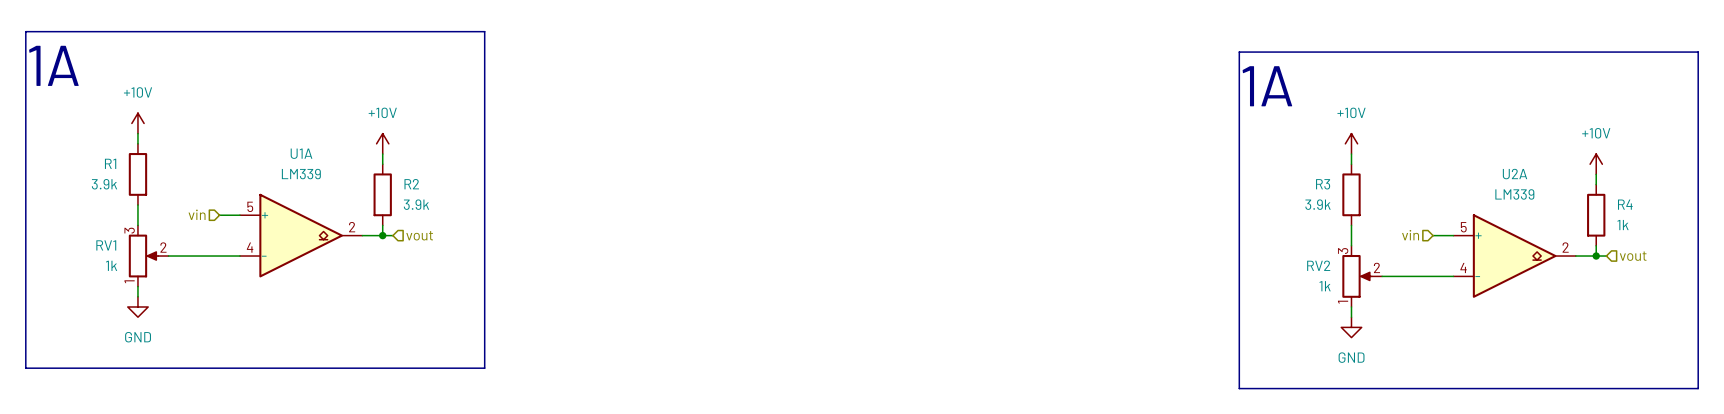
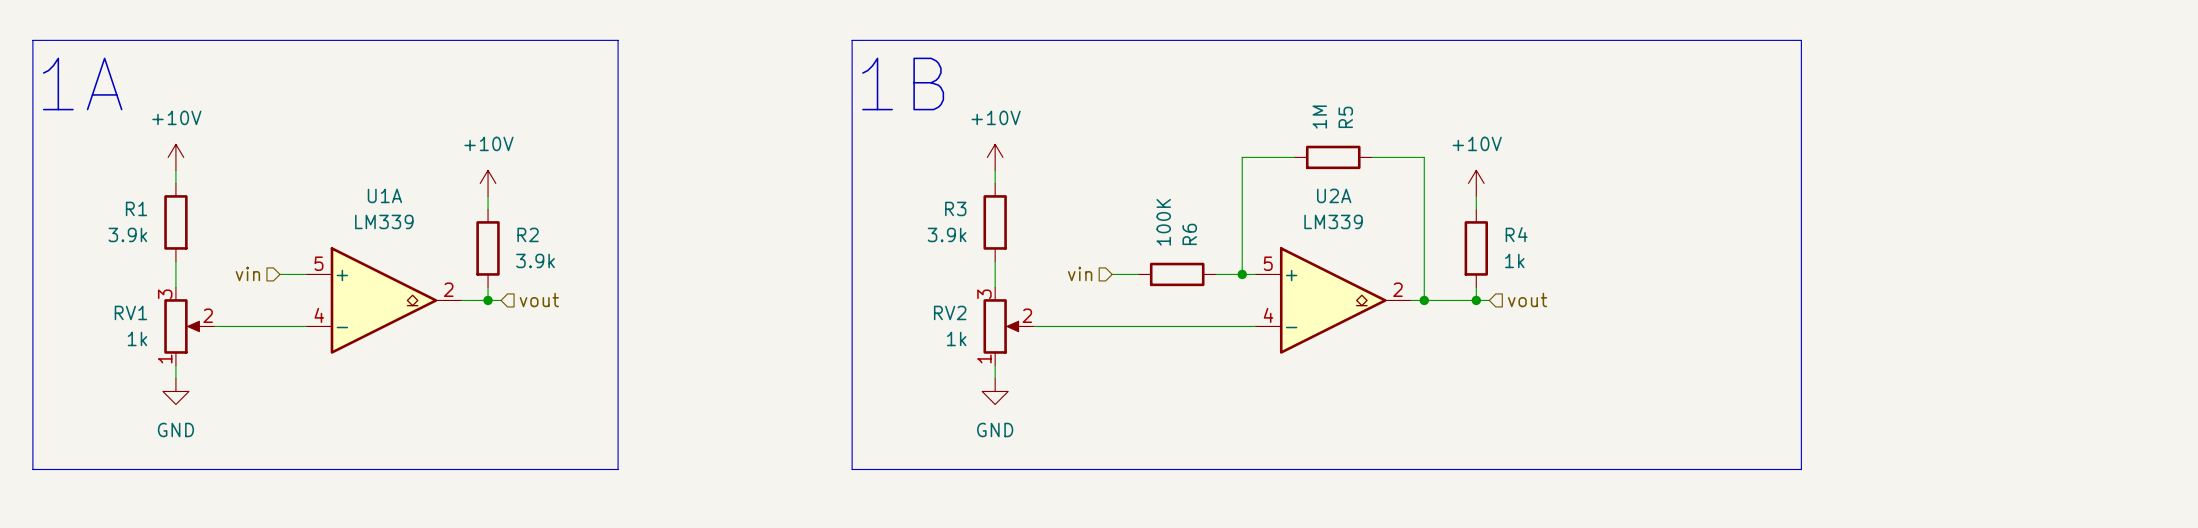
line: none -> (852, 40) (1801, 40) (1801, 469) (852, 469) (852, 40)
line: (1239, 52) (1698, 52) (1698, 388) (1239, 388) (1239, 52) -> none
text: none -> 1B (903, 83)
text: 1A (1267, 86) -> none
power symbol: none -> +10V (995, 157)
wire: none -> (1294, 157) (1242, 157) (1242, 274)
R5: none -> 1M (1333, 157)
wire: none -> (1372, 157) (1424, 157) (1424, 300)
wire: none -> (995, 170) (995, 183)
power symbol position: +10V (1351, 143) -> +10V (1476, 183)
wire: (1351, 154) (1351, 164) -> (1476, 196) (1476, 209)
power symbol: +10V (1596, 164) -> none
wire: (1596, 174) (1596, 184) -> none
R3 position: (1351, 194) -> (995, 222)
wire: none -> (995, 261) (995, 287)
hierarchical label: none -> vin (1080, 273)
wire: none -> (1112, 274) (1138, 274)
R6: none -> 100K (1177, 274)
wire: none -> (1216, 274) (1255, 274)
junction: none -> (1242, 274)
R4 position: (1596, 215) -> (1476, 248)
wire: none -> (1476, 287) (1476, 300)
wire: (1351, 225) (1351, 245) -> none
wire: none -> (1411, 300) (1489, 300)
junction: none -> (1424, 300)
junction: none -> (1476, 300)
hierarchical label: none -> vout (1527, 299)
hierarchical label: vin (1410, 235) -> none
wire: (1433, 235) (1453, 235) -> none
wire: (1596, 245) (1596, 256) -> none
wire: none -> (1034, 326) (1255, 326)
U2A position: (1514, 256) -> (1333, 300)
wire: (1575, 256) (1606, 256) -> none
junction: (1596, 256) -> none
hierarchical label: vout (1633, 256) -> none
RV2 position: (1362, 276) -> (1008, 326)
wire: (1382, 276) (1453, 276) -> none
wire: none -> (995, 365) (995, 378)
power symbol: none -> GND (995, 391)
wire: (1351, 307) (1351, 317) -> none
power symbol: GND (1351, 327) -> none

